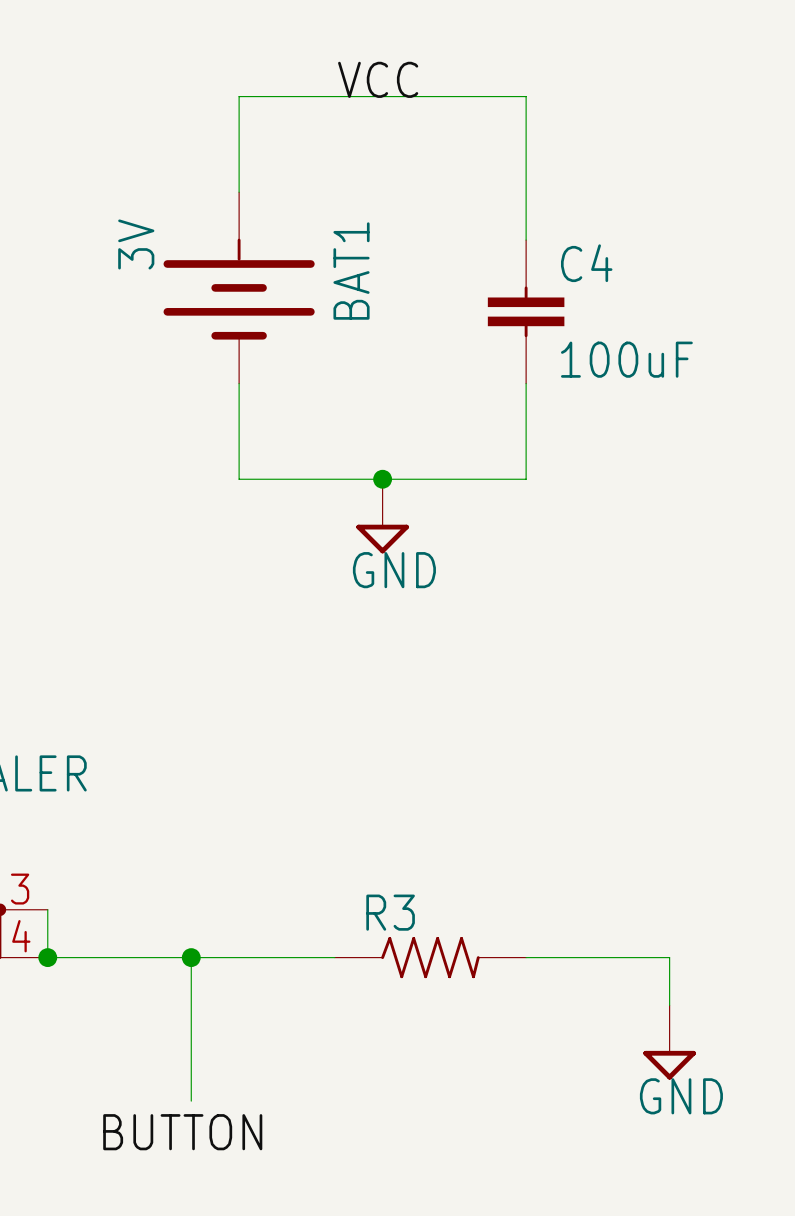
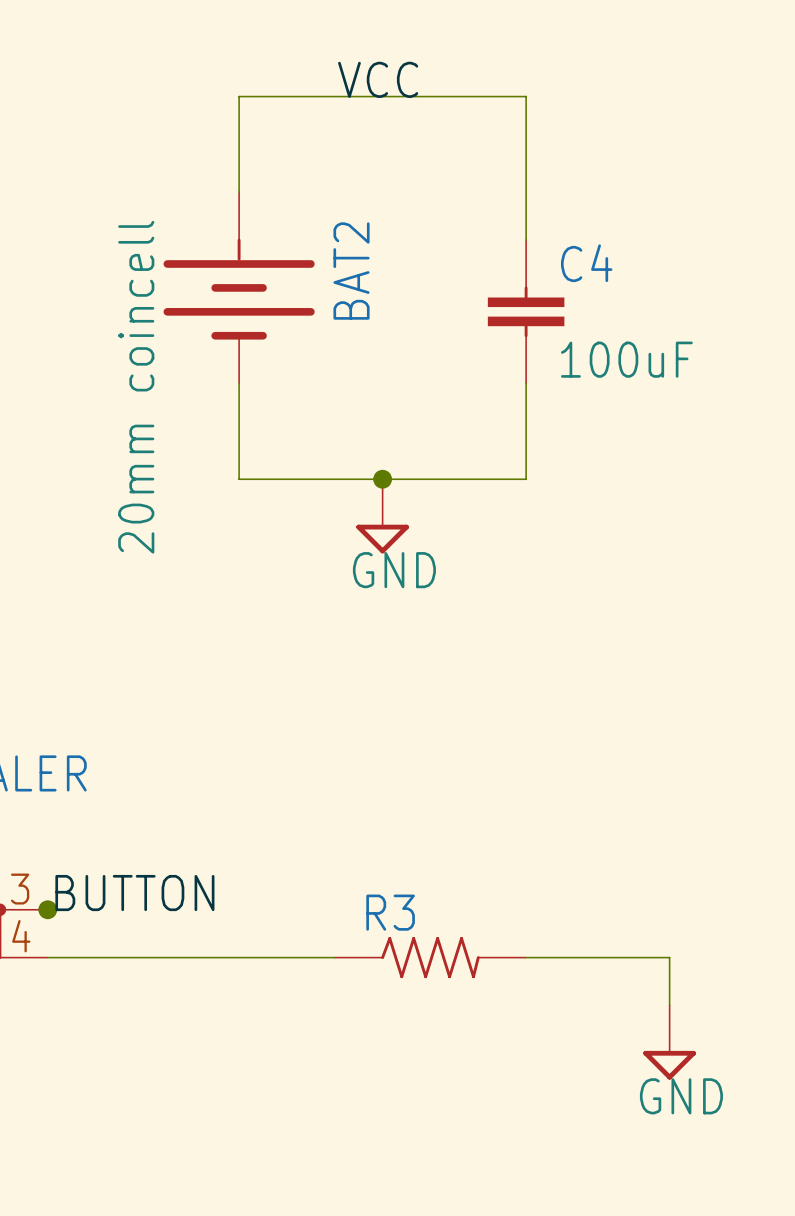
BAT1 value: 3V (136, 244) -> 20mm coincell (136, 387)
BAT1 name: BAT1 (351, 271) -> BAT2 (351, 271)
wire: (47, 909) (47, 957) -> none
junction position: (47, 957) -> (47, 909)
wire: (191, 957) (191, 1101) -> none
junction: (191, 957) -> none
label position: BUTTON (182, 1132) -> BUTTON (134, 893)

